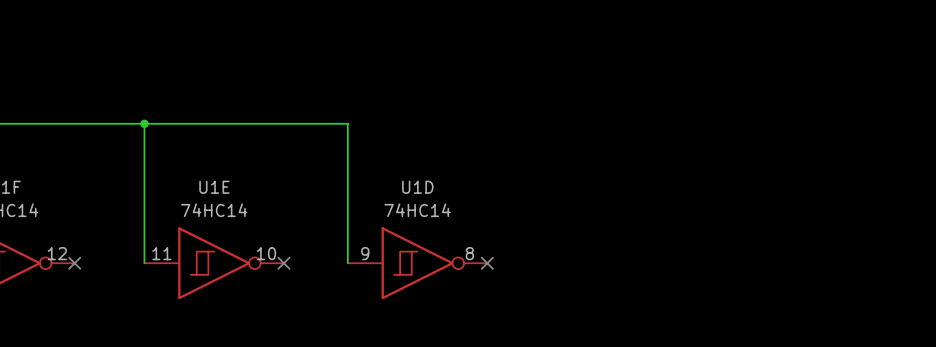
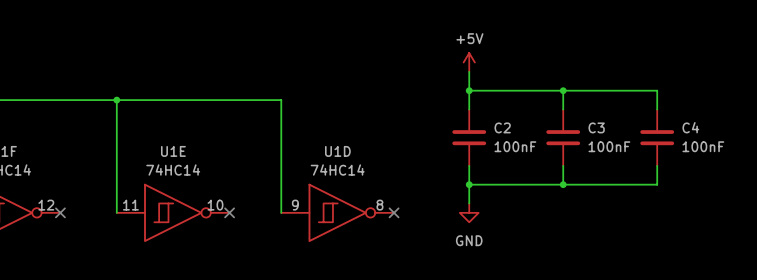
power symbol: none -> +5V (469, 62)
wire: none -> (469, 71) (469, 109)
wire: none -> (469, 90) (657, 90) (657, 109)
junction: none -> (469, 90)
wire: none -> (563, 90) (563, 109)
junction: none -> (563, 90)
C2: none -> 100nF (469, 137)
C3: none -> 100nF (563, 137)
C4: none -> 100nF (657, 137)
wire: none -> (469, 165) (469, 203)
wire: none -> (563, 165) (563, 184)
wire: none -> (657, 165) (657, 184) (469, 184)
junction: none -> (469, 184)
junction: none -> (563, 184)
power symbol: none -> GND (469, 212)

